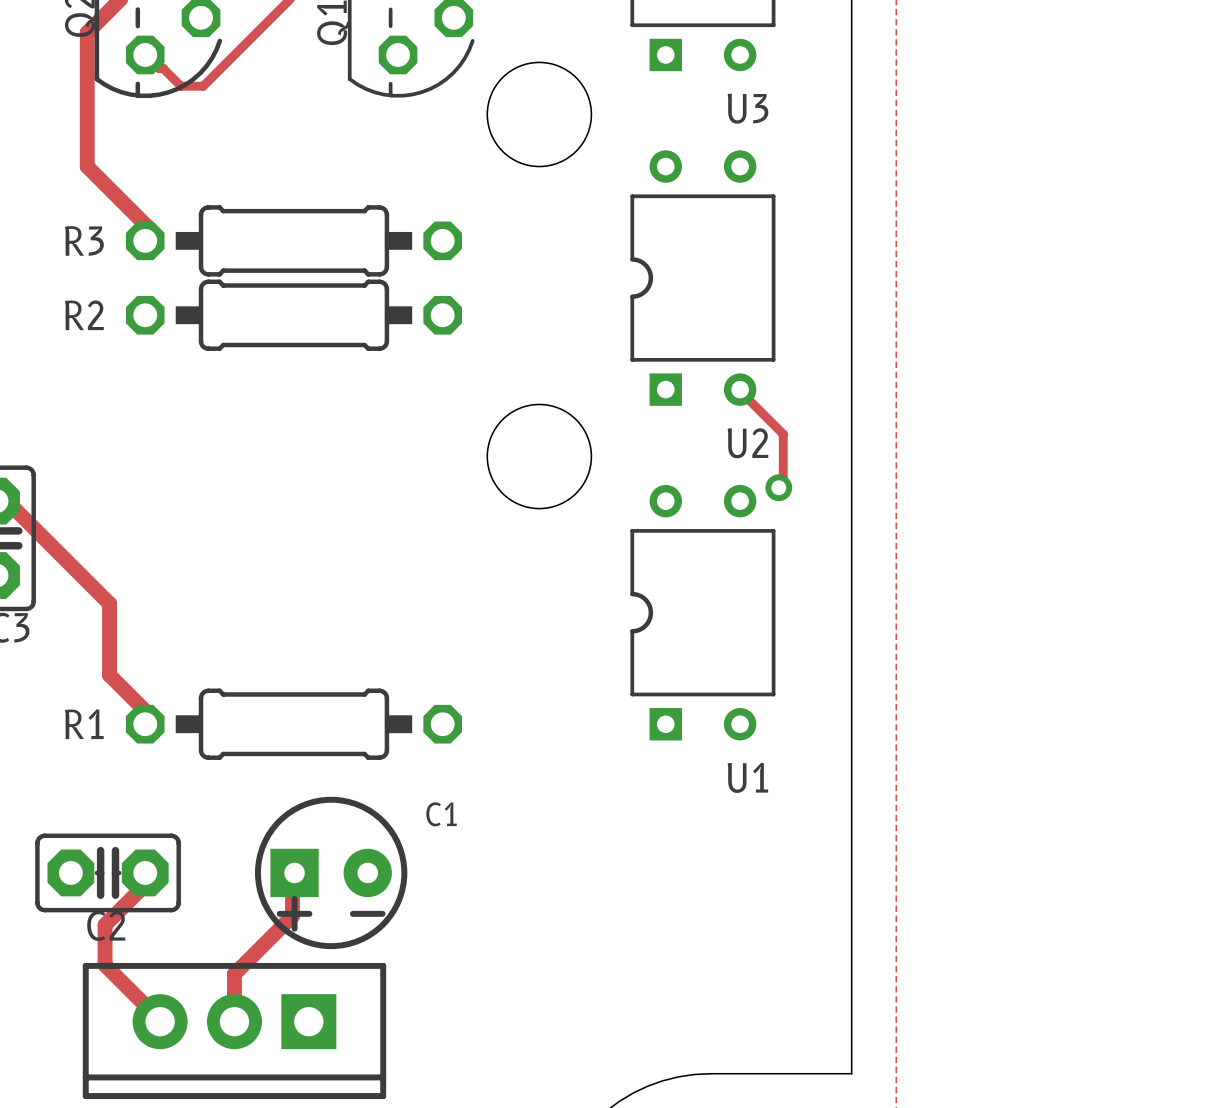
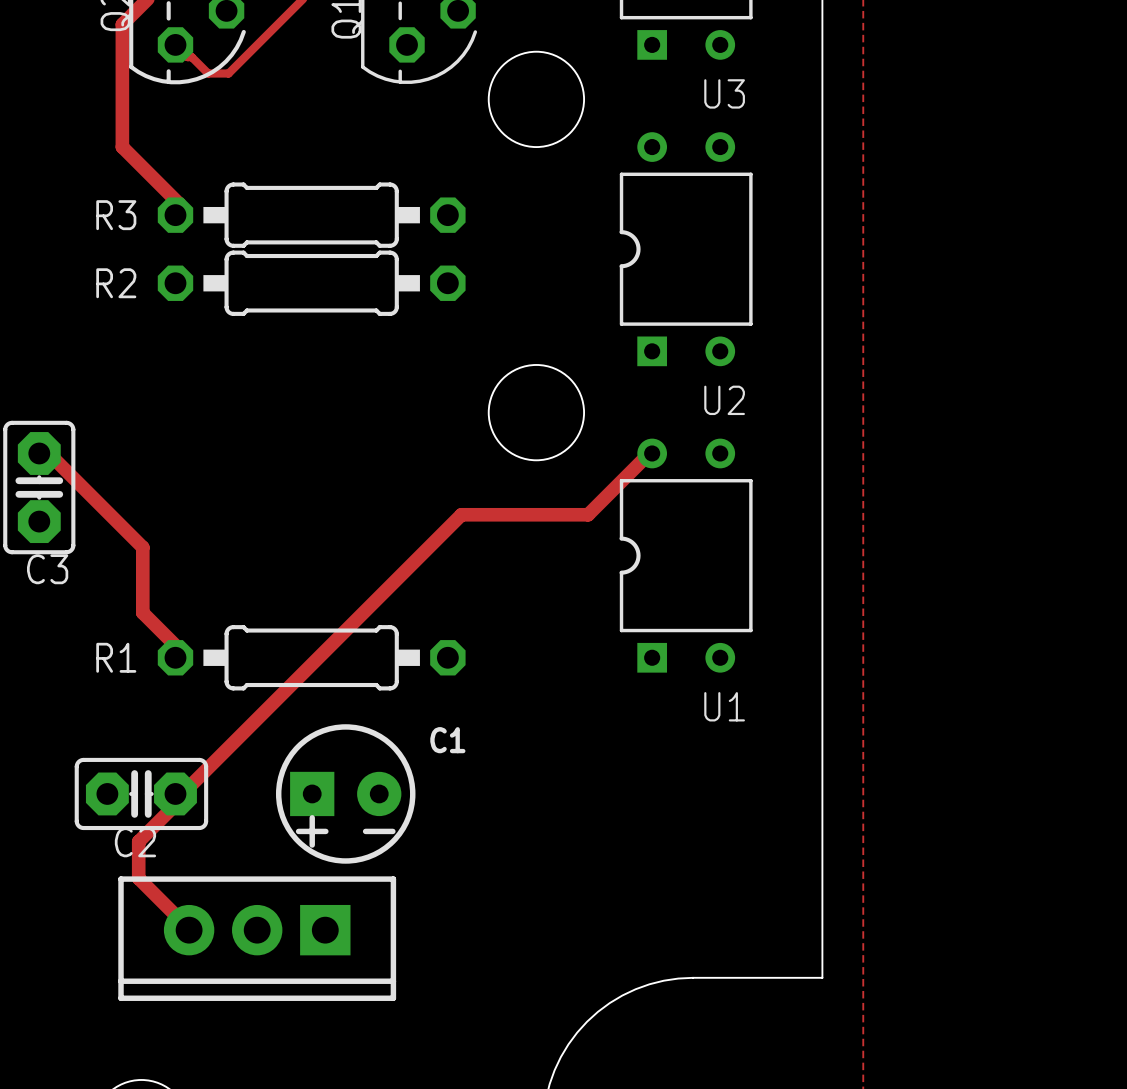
track: (740, 389) (743, 389) (743, 394) (783, 434) (783, 483) (778, 487) -> none
via: (778, 487) -> none
track: none -> (652, 453) (649, 453) (588, 514) (461, 514) (187, 788) (179, 788) (175, 793)
track: (294, 872) (292, 875) (292, 916) (234, 974) (234, 1021) -> none

